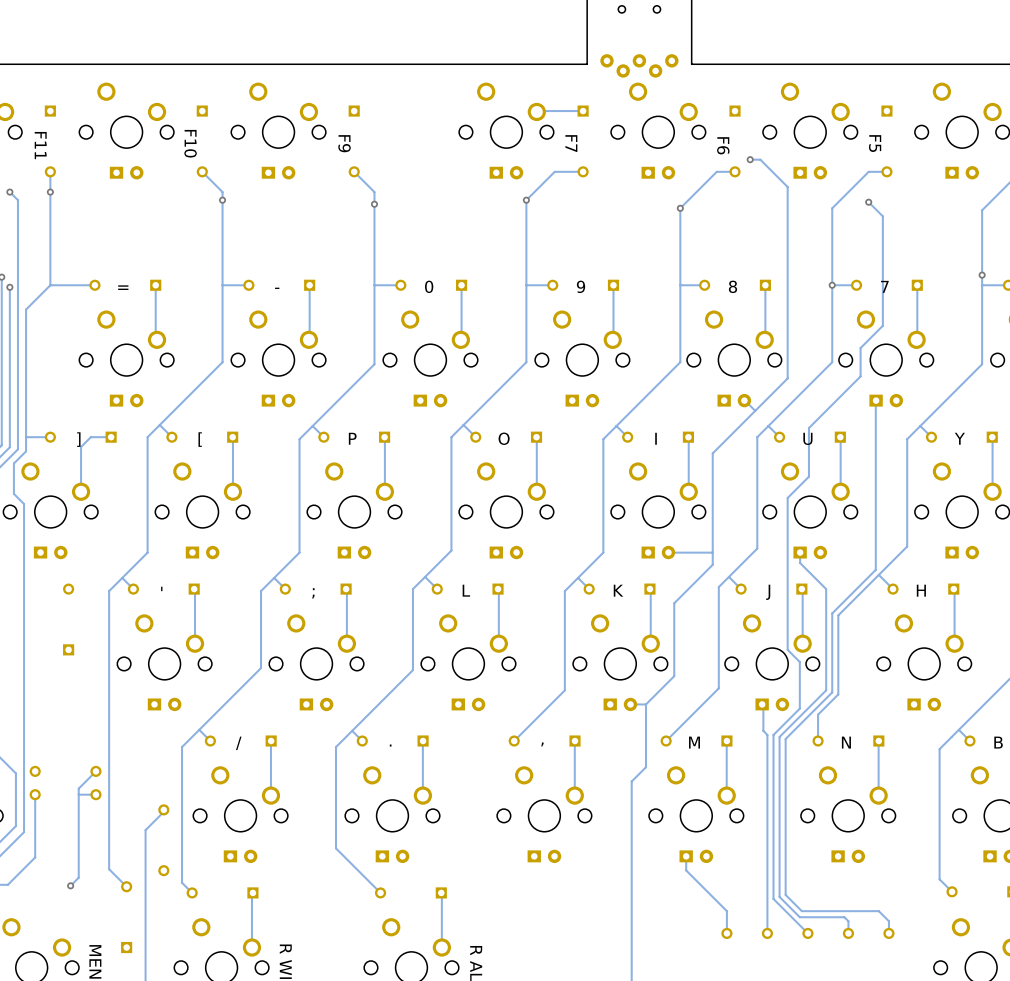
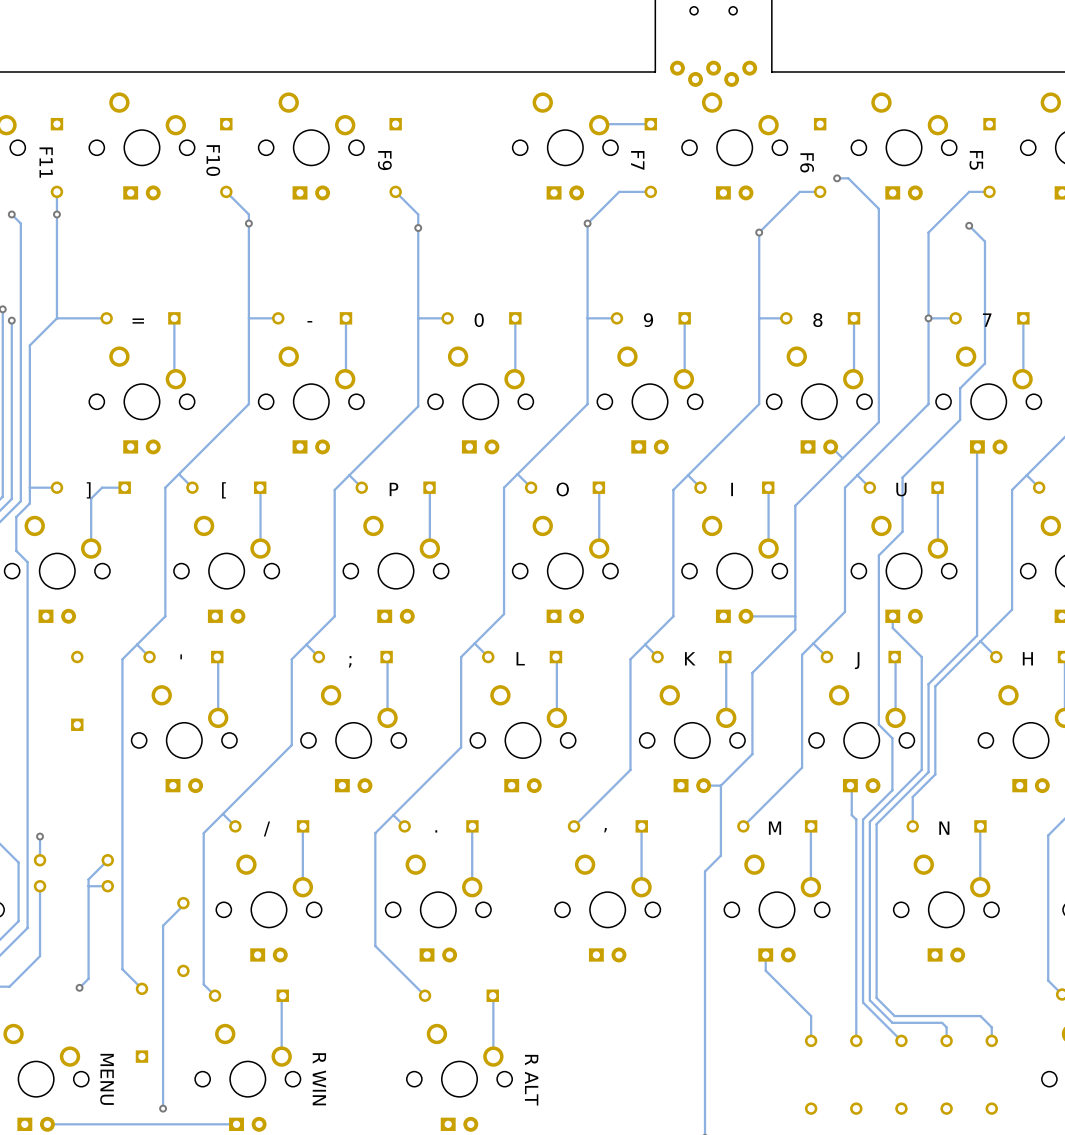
track: none -> (40, 836) (40, 860)
via: none -> (40, 836)

